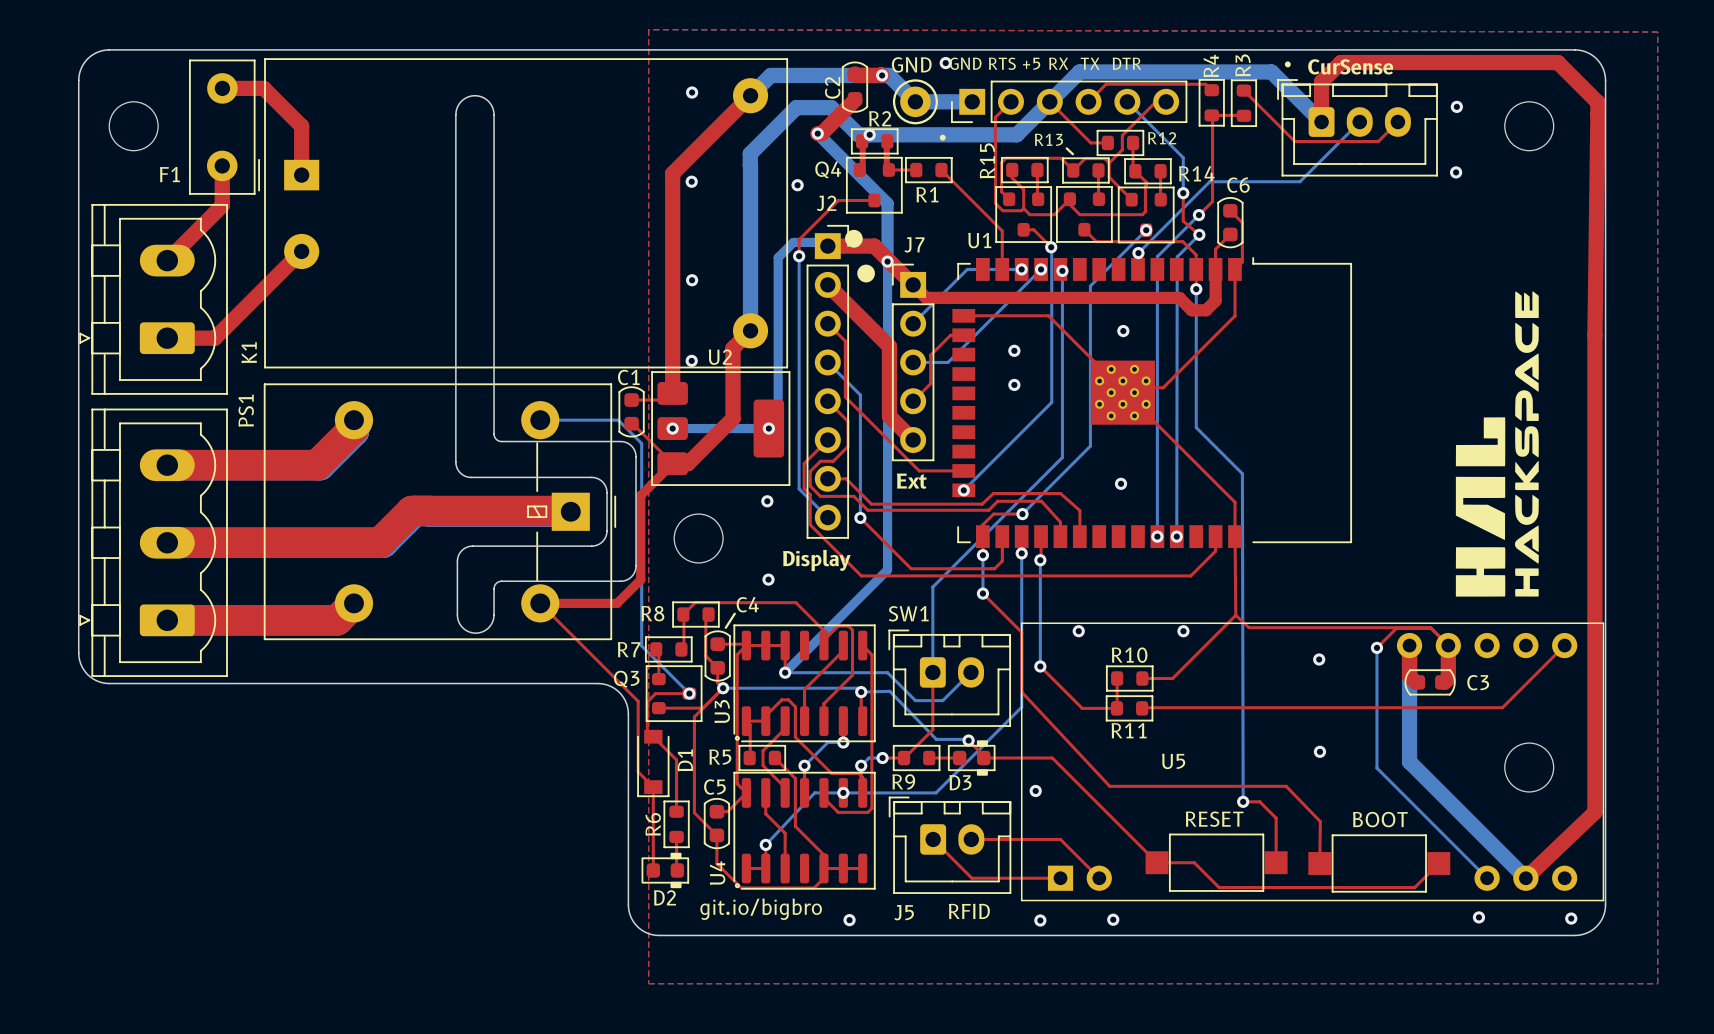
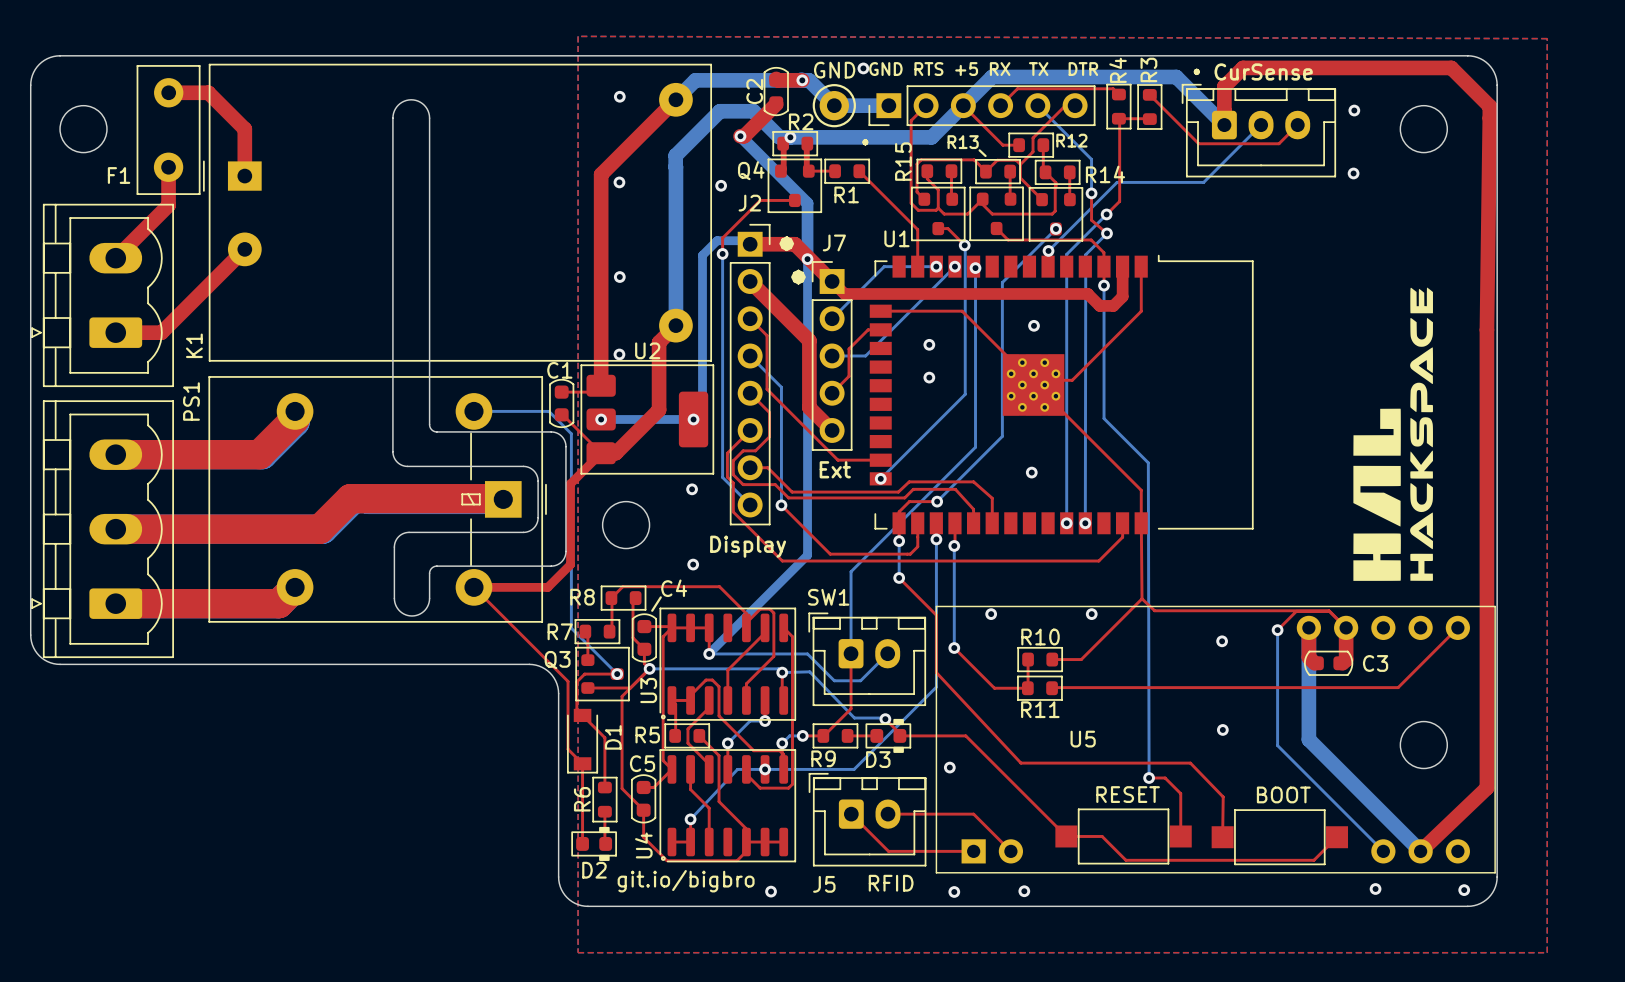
top track: (1230, 210) (1242, 222) (1242, 261) (1234, 269) -> none
C6: (1230, 222) -> none
top track: (1230, 234) (1215, 249) (1215, 269) -> none

